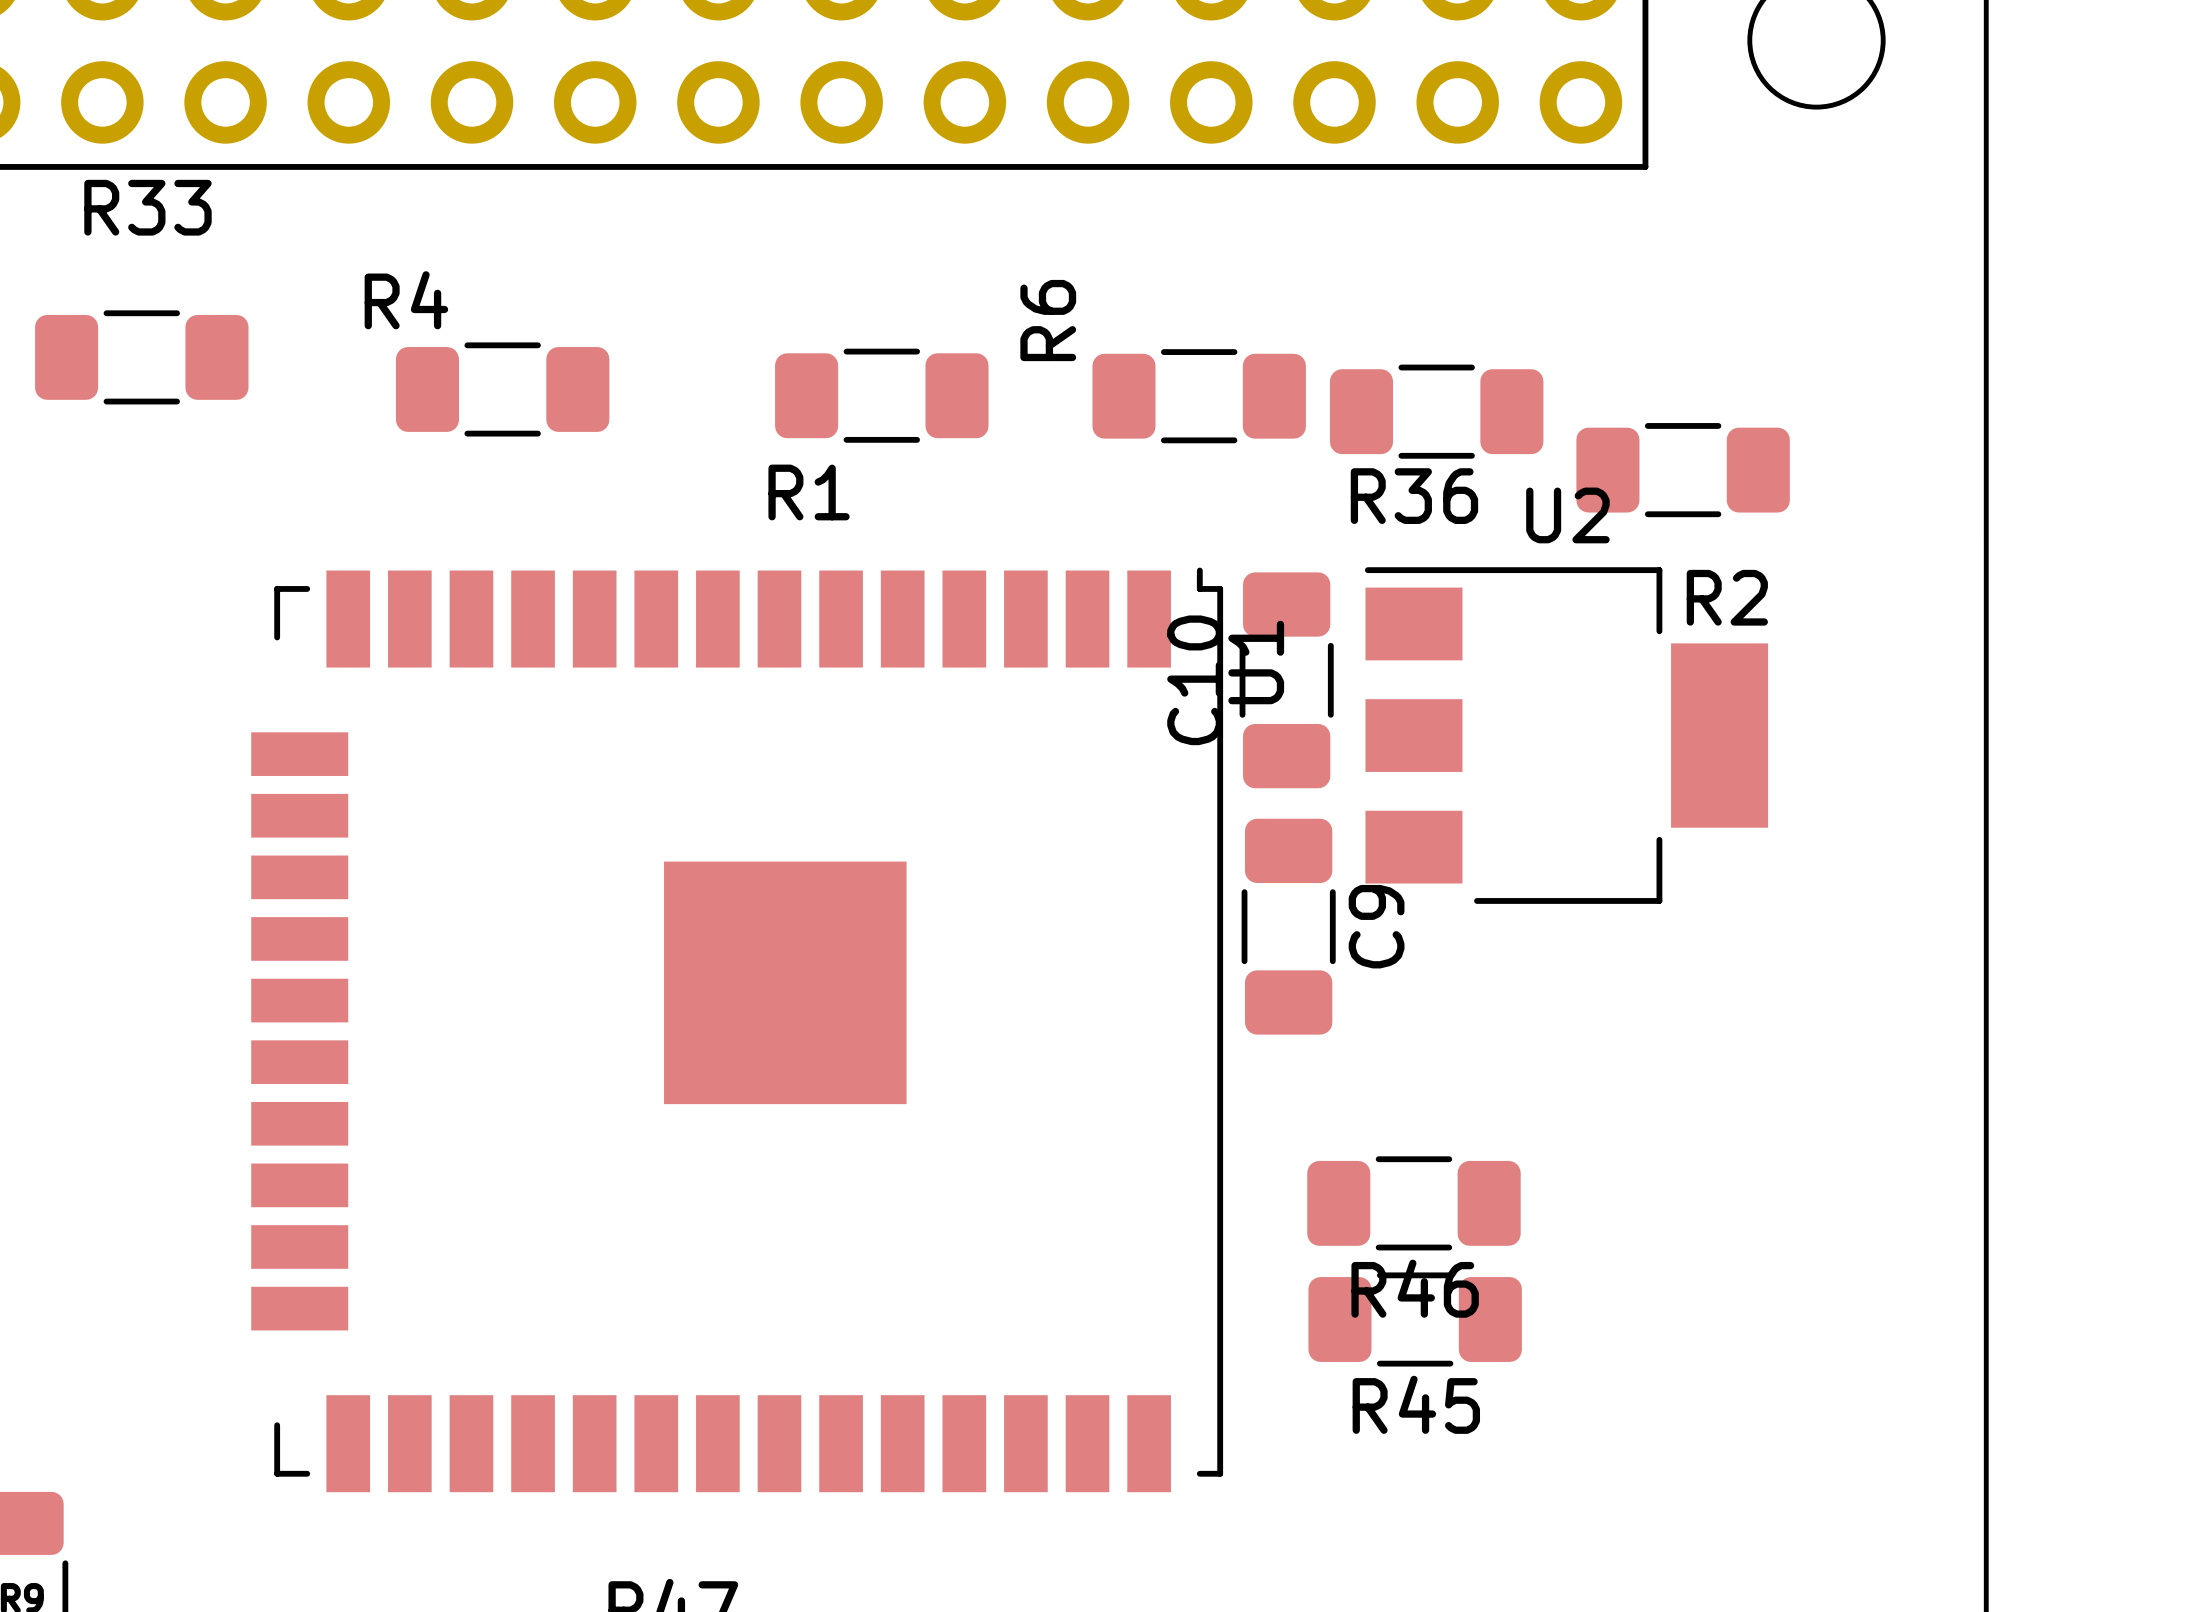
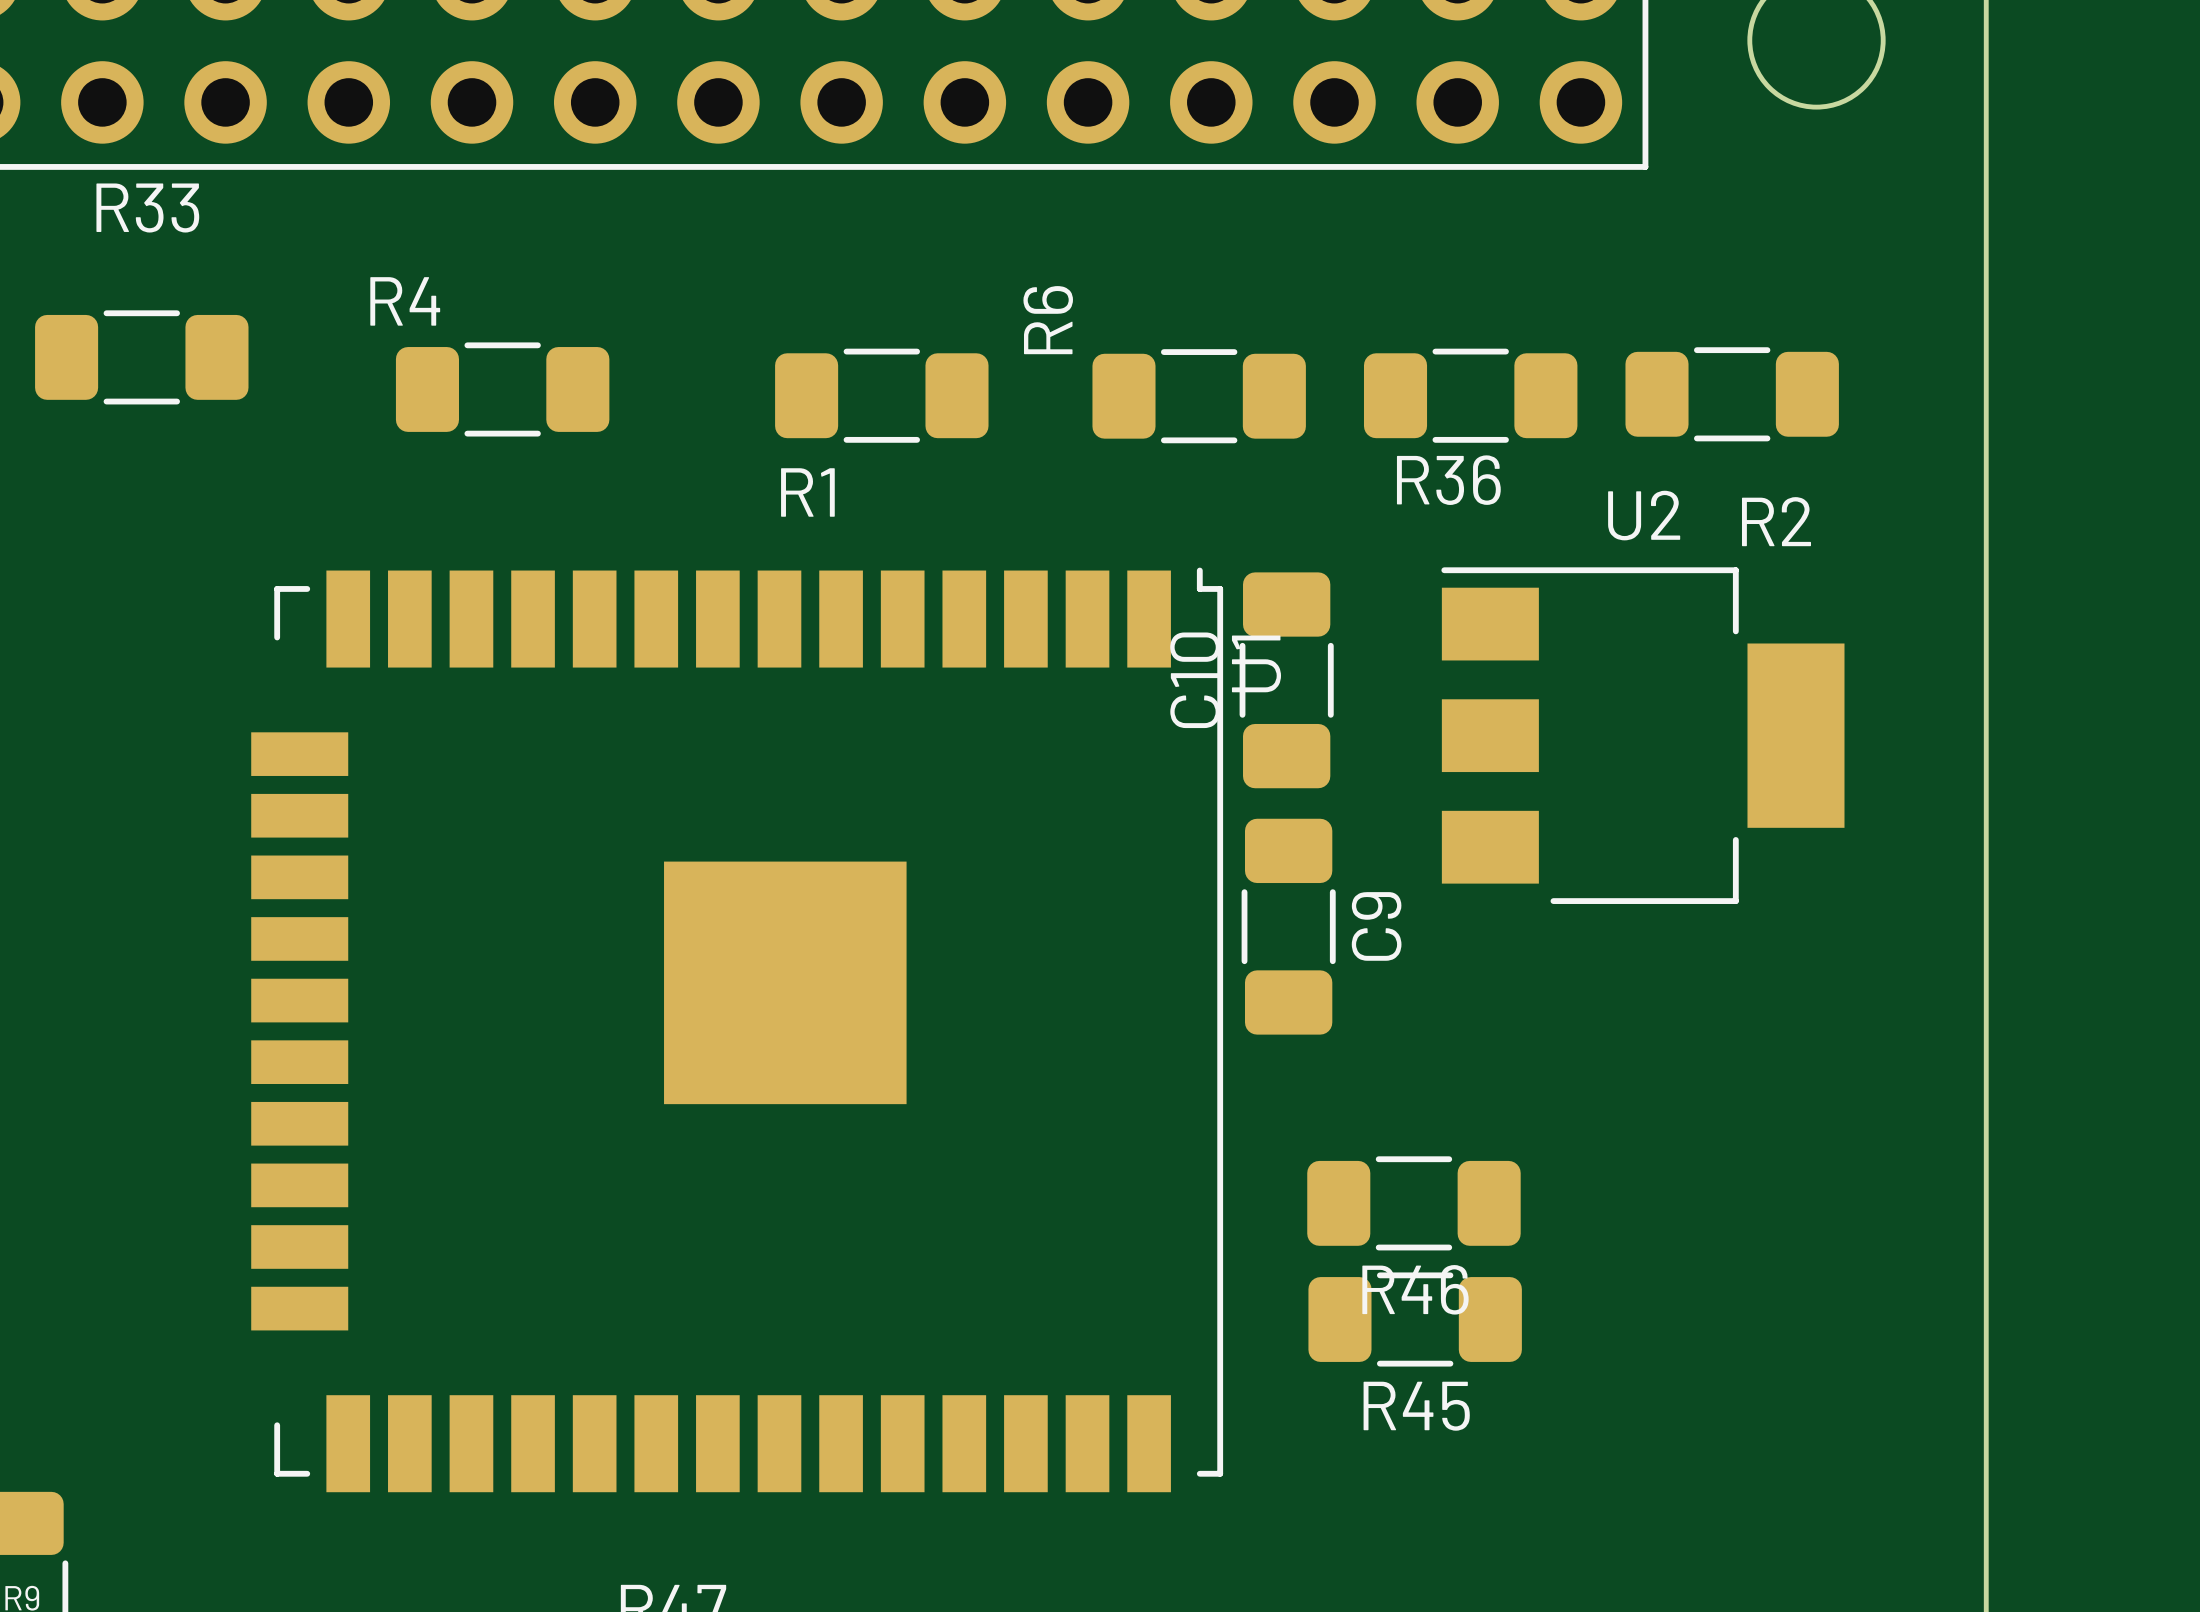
R36 position: (1436, 411) -> (1470, 395)
R2 position: (1683, 470) -> (1732, 394)
U2 position: (1566, 735) -> (1642, 735)

